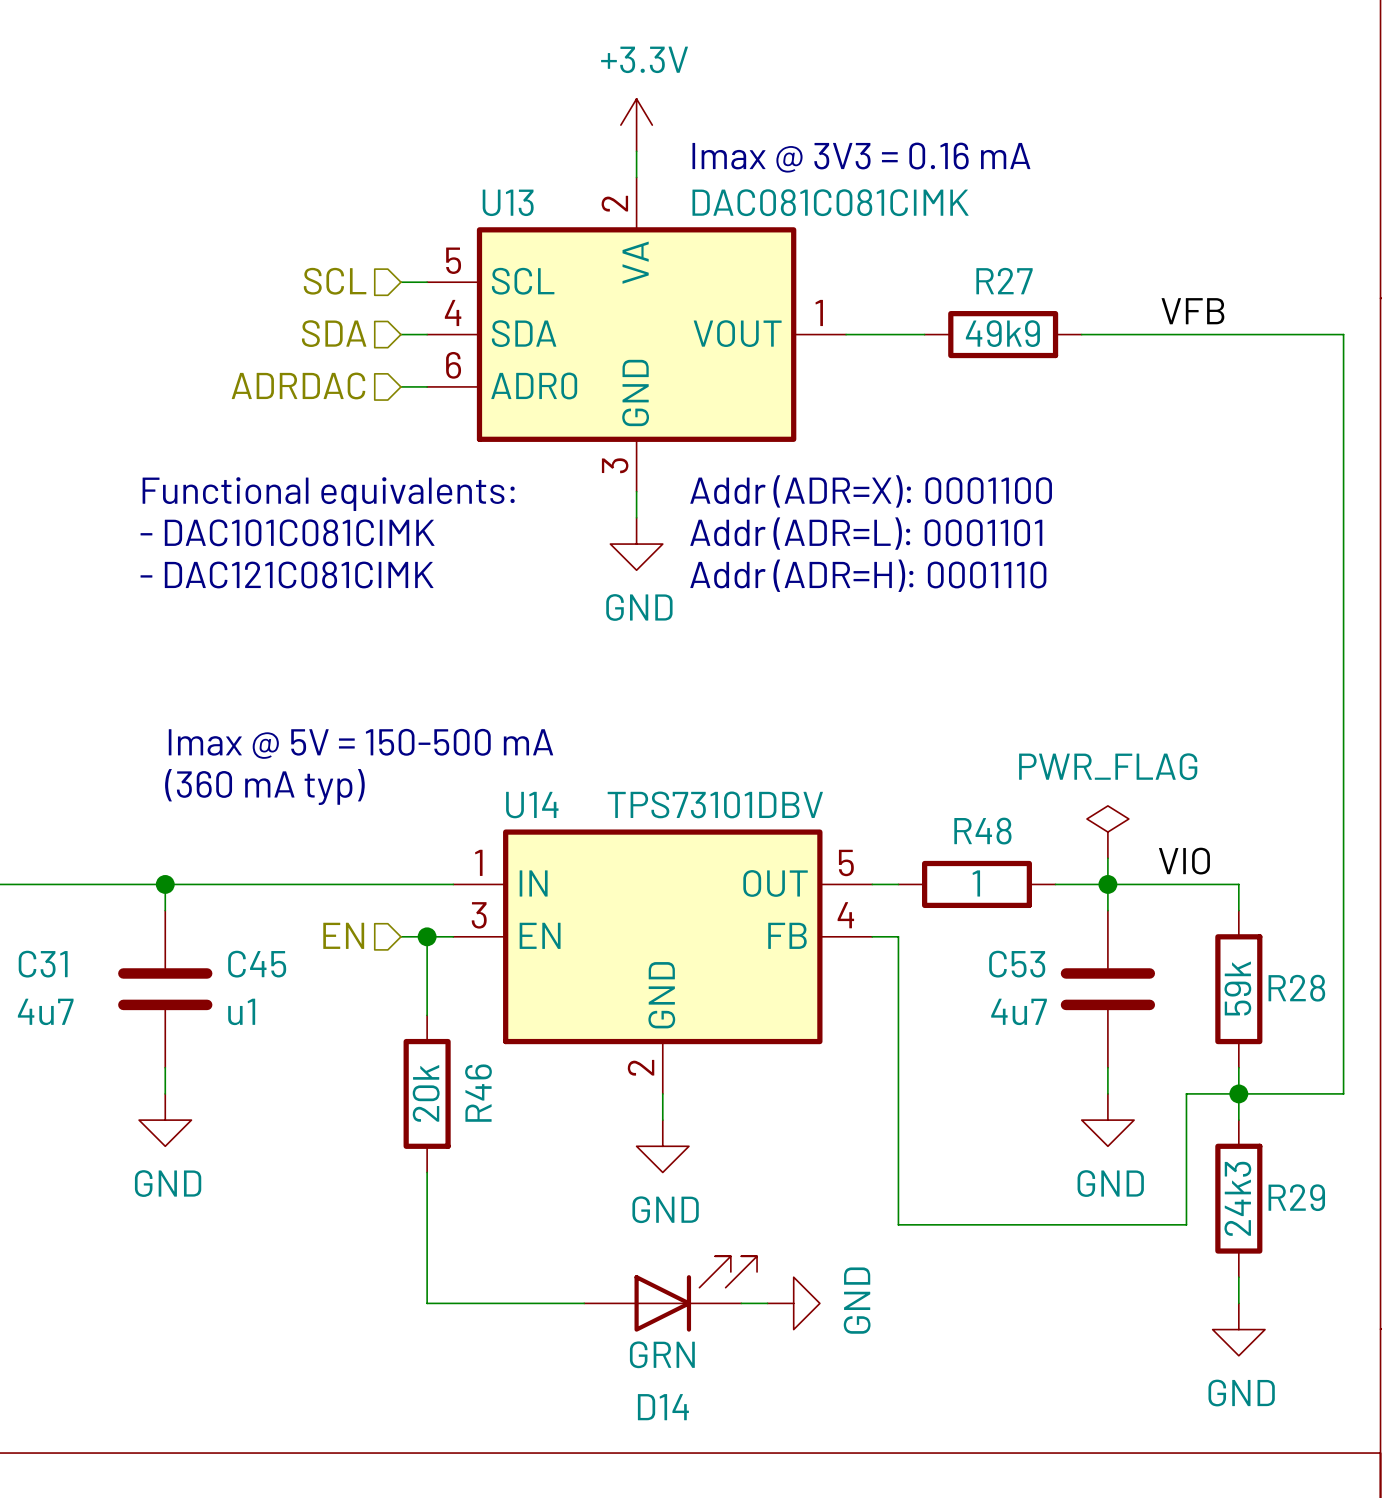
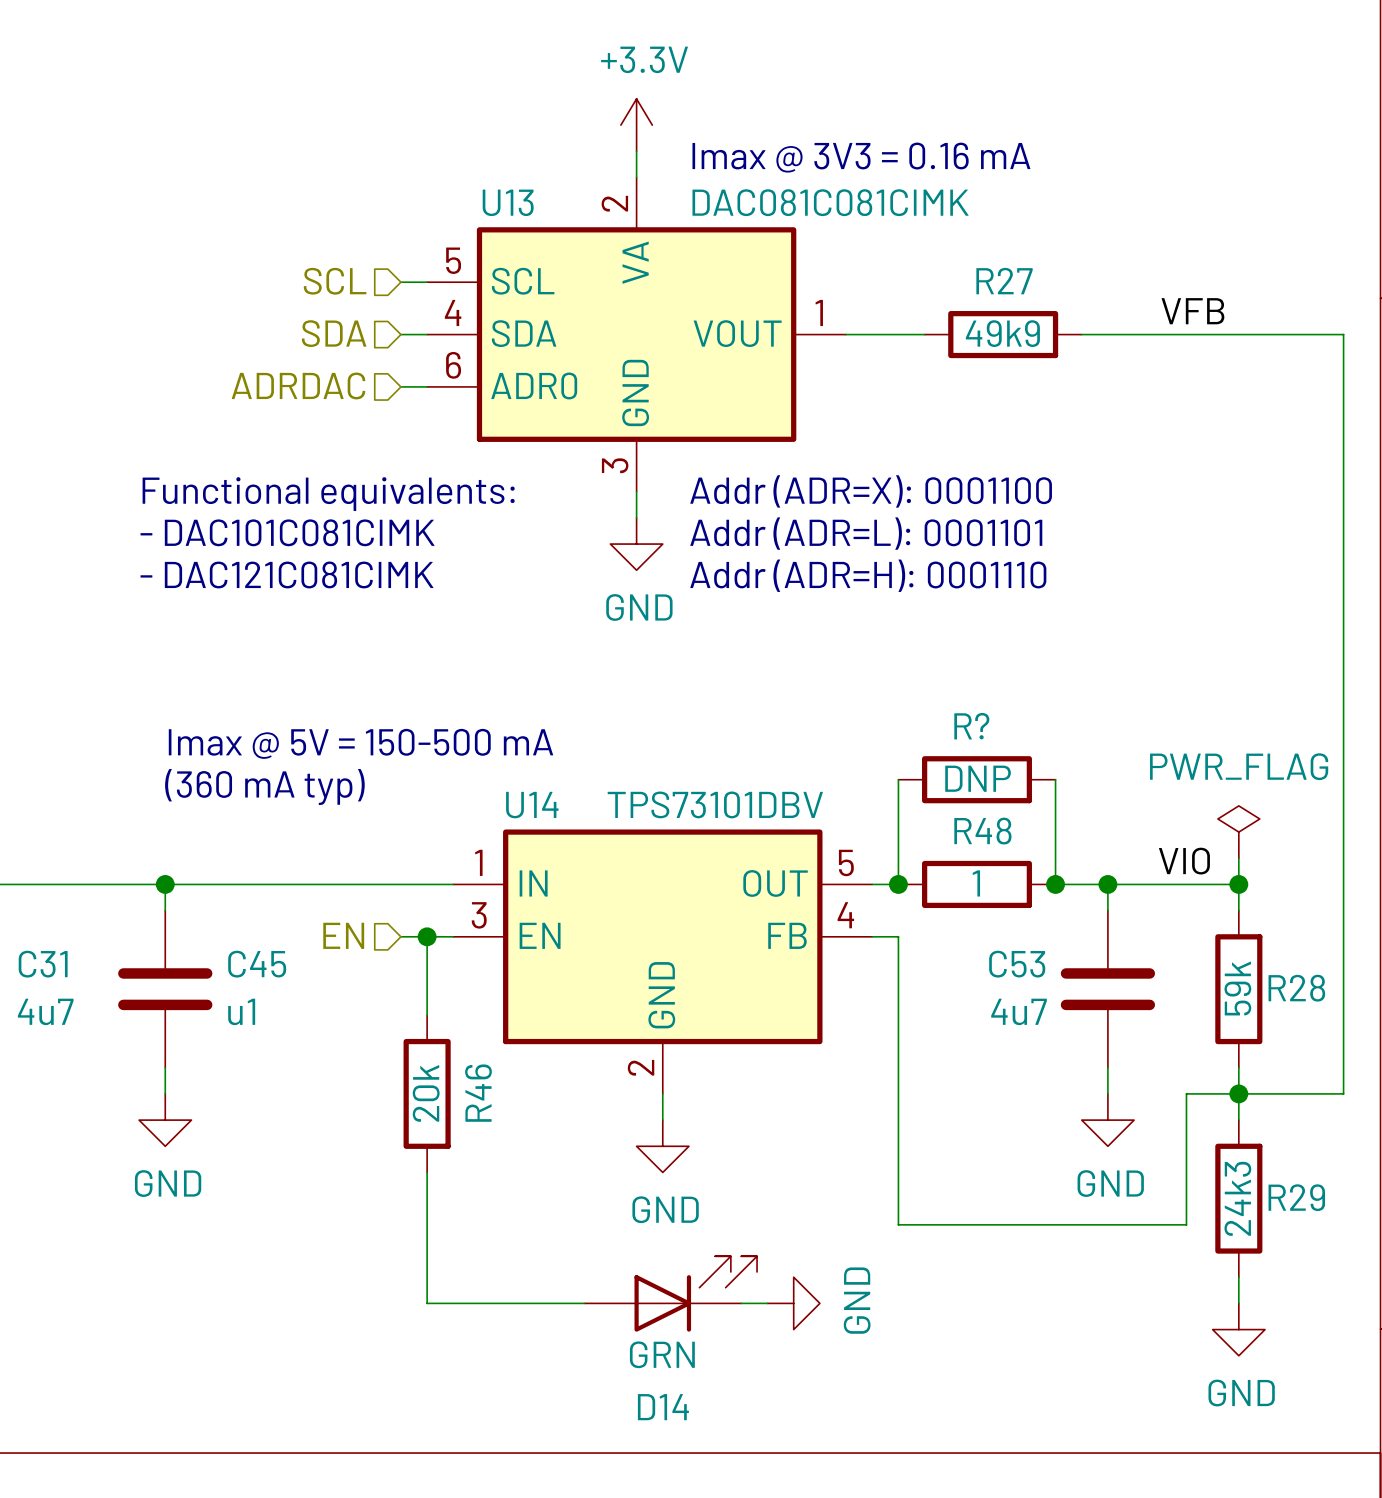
wire: none -> (898, 779) (898, 884)
R?: none -> DNP (976, 779)
wire: none -> (1055, 779) (1055, 884)
power symbol position: PWR_FLAG (1107, 832) -> PWR_FLAG (1238, 832)
wire: (1107, 858) (1107, 884) -> (1238, 858) (1238, 884)
junction: none -> (898, 884)
junction: none -> (1055, 884)
junction: none -> (1238, 884)

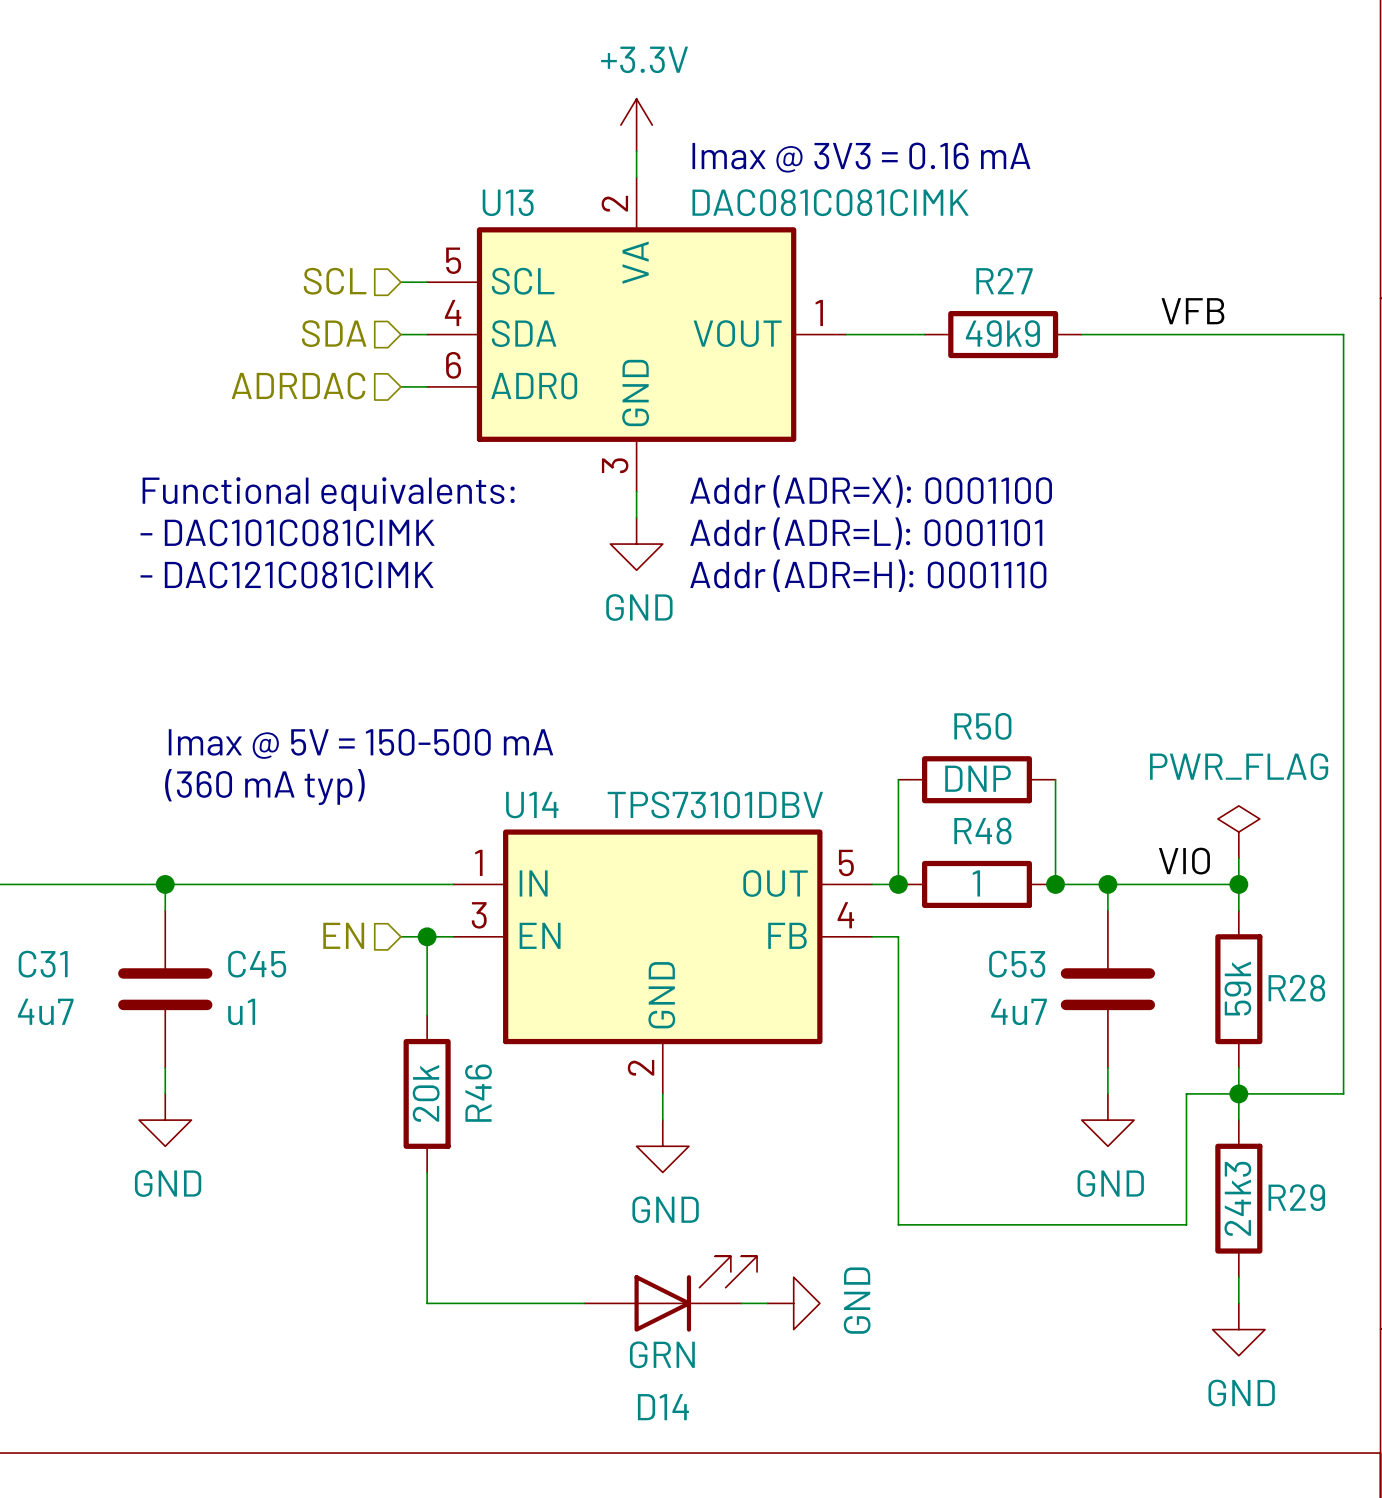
R? name: R? (971, 726) -> R50 (982, 726)

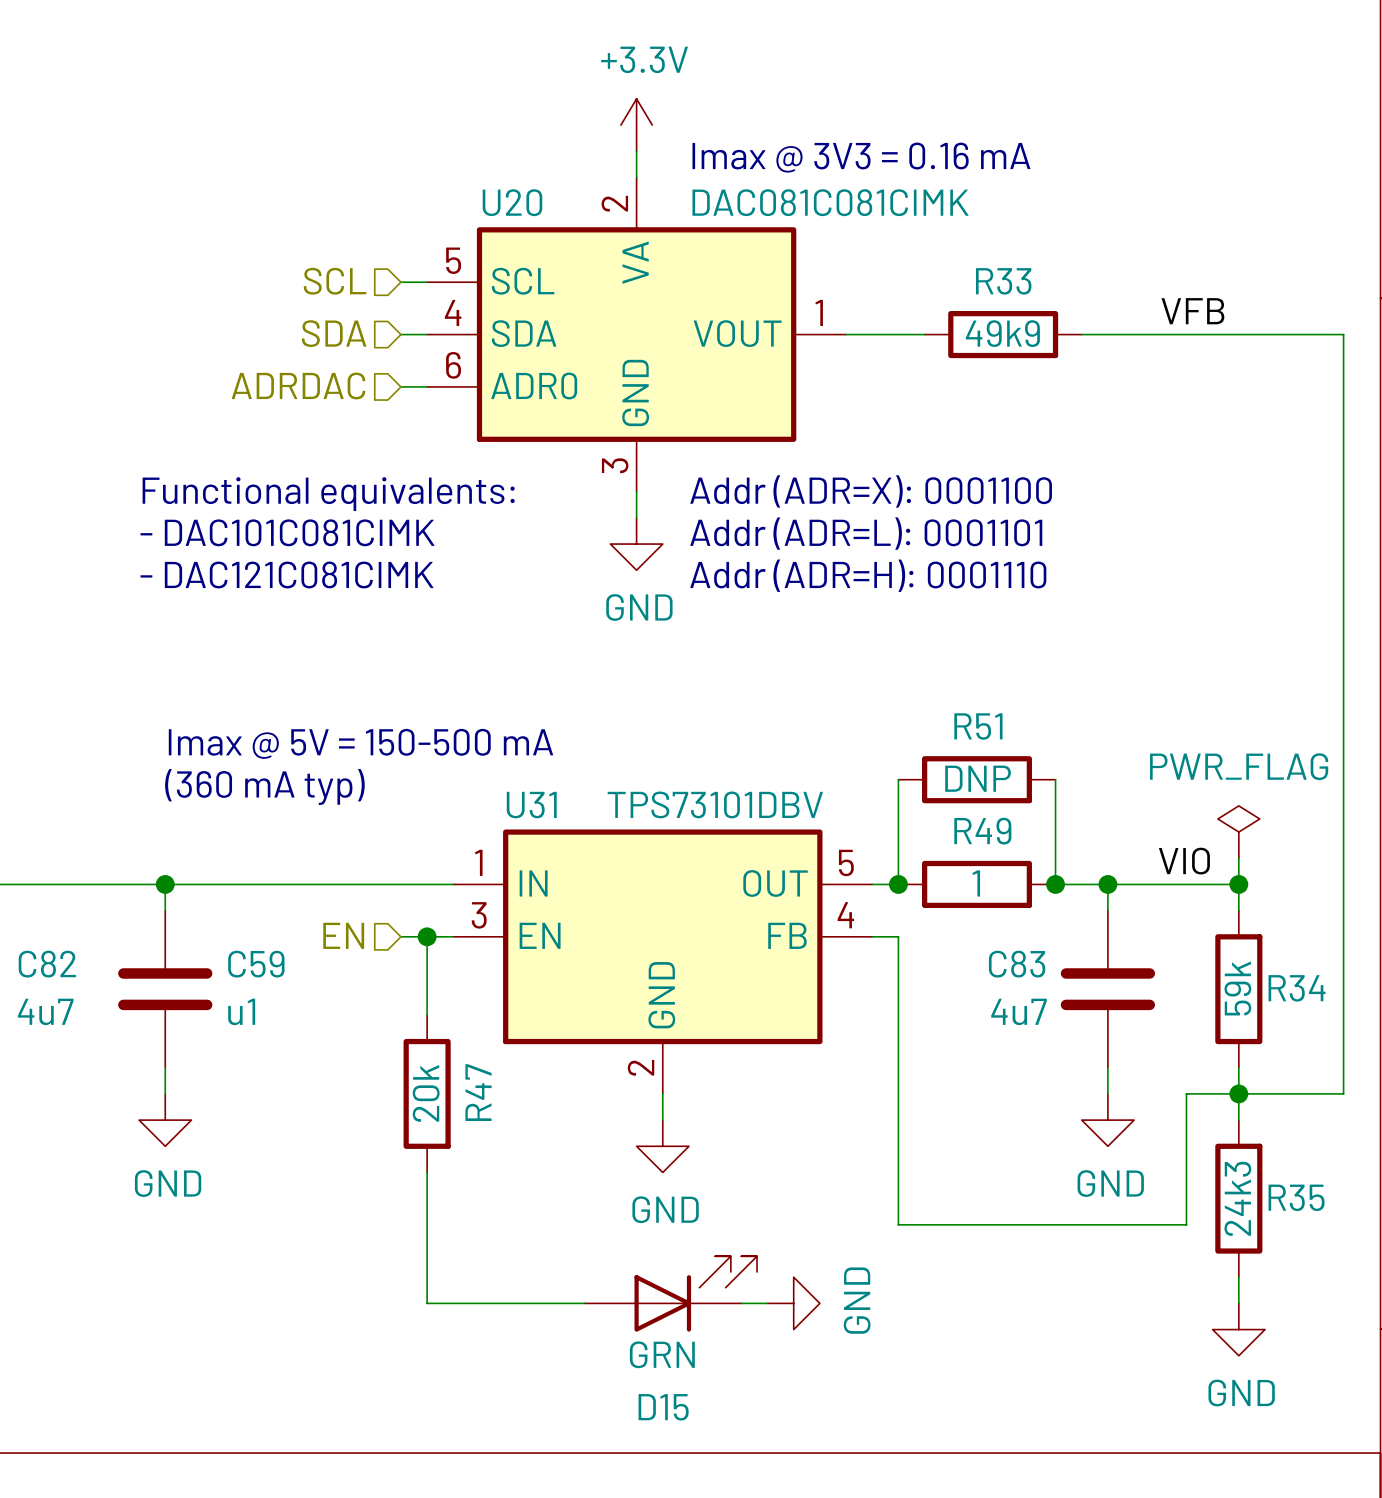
U13 name: U13 (508, 202) -> U20 (512, 202)
R27 name: R27 (1004, 281) -> R33 (1003, 281)
R50 name: R50 (982, 726) -> R51 (978, 726)
U14 name: U14 (532, 805) -> U31 (531, 805)
R48 name: R48 (982, 831) -> R49 (982, 831)
C31 name: C31 (43, 964) -> C82 (47, 964)
C45 name: C45 (257, 964) -> C59 (256, 964)
C53 name: C53 (1017, 964) -> C83 (1017, 964)
R28 name: R28 (1296, 988) -> R34 (1297, 988)
R46 name: R46 (478, 1093) -> R47 (478, 1092)
R29 name: R29 (1296, 1197) -> R35 (1296, 1197)
D14 name: D14 (663, 1407) -> D15 (663, 1407)

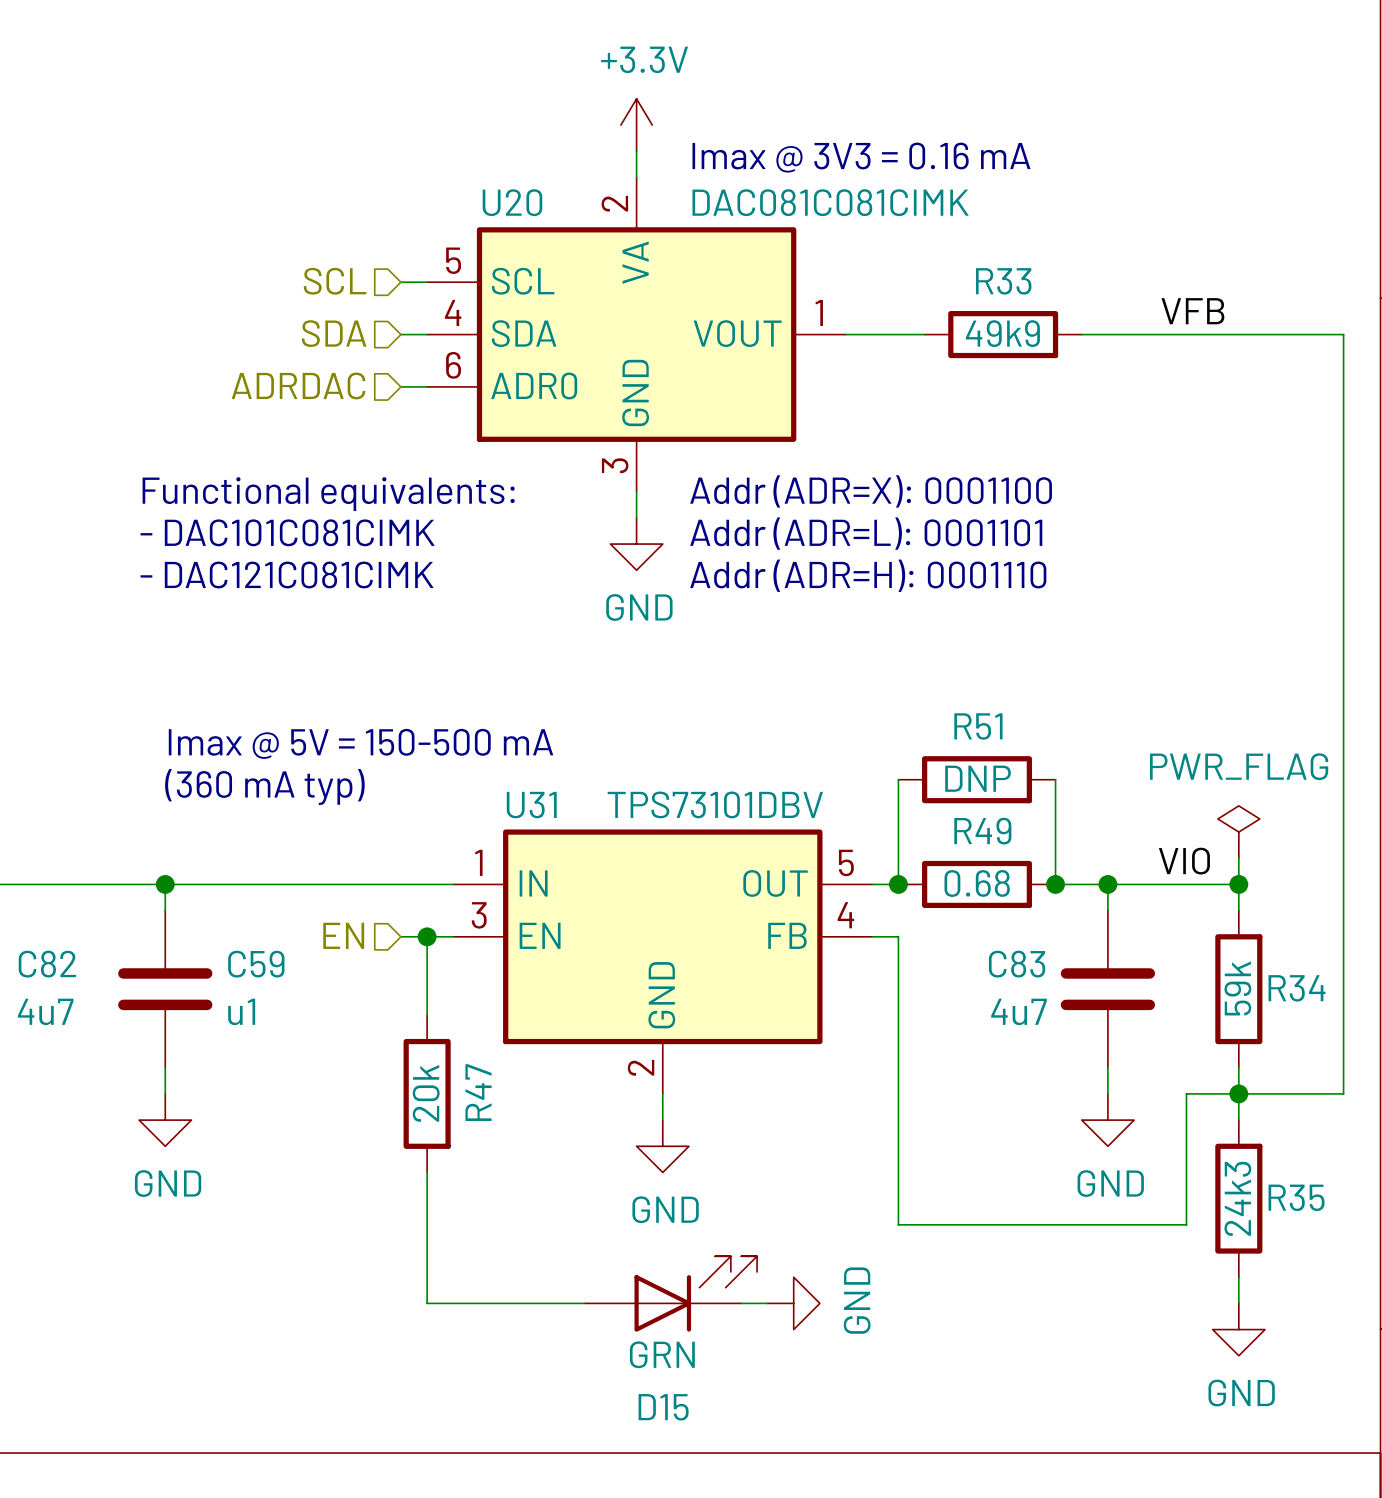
R49 value: 1 (976, 883) -> 0.68 (977, 883)

